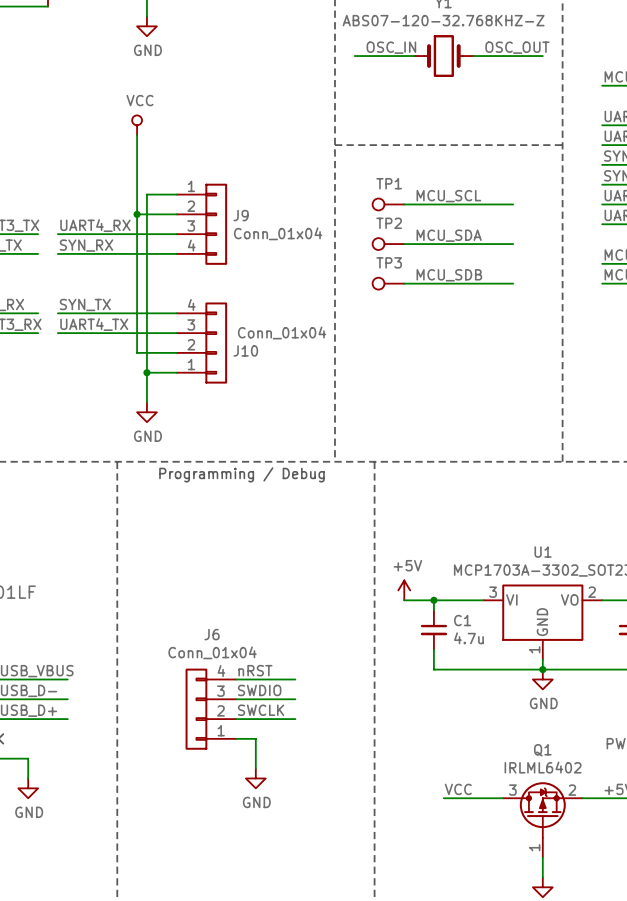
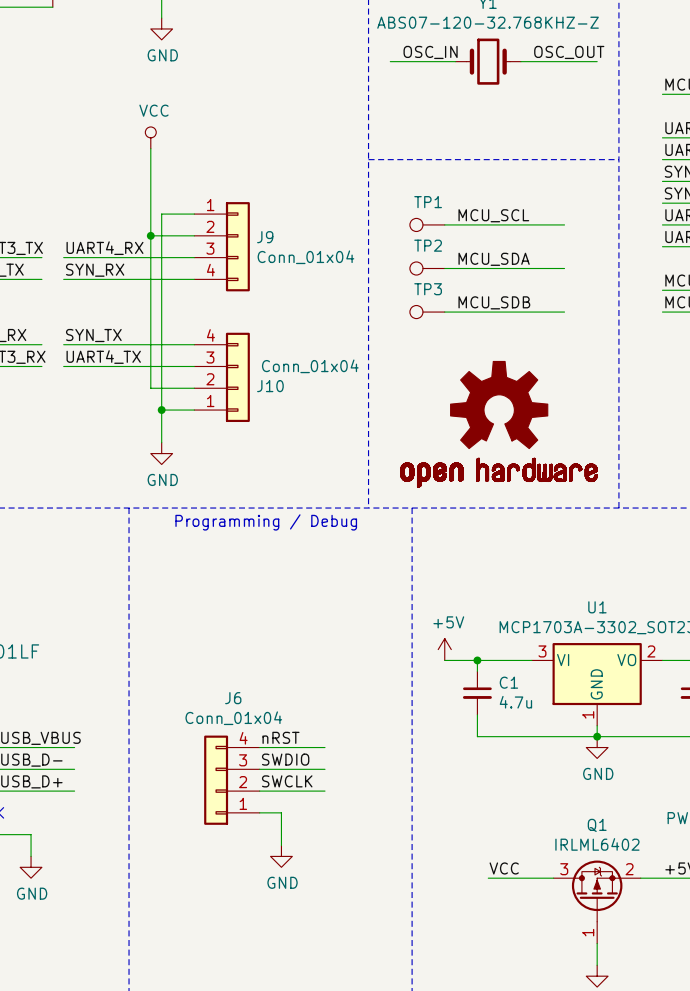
part: none -> (499, 424)

